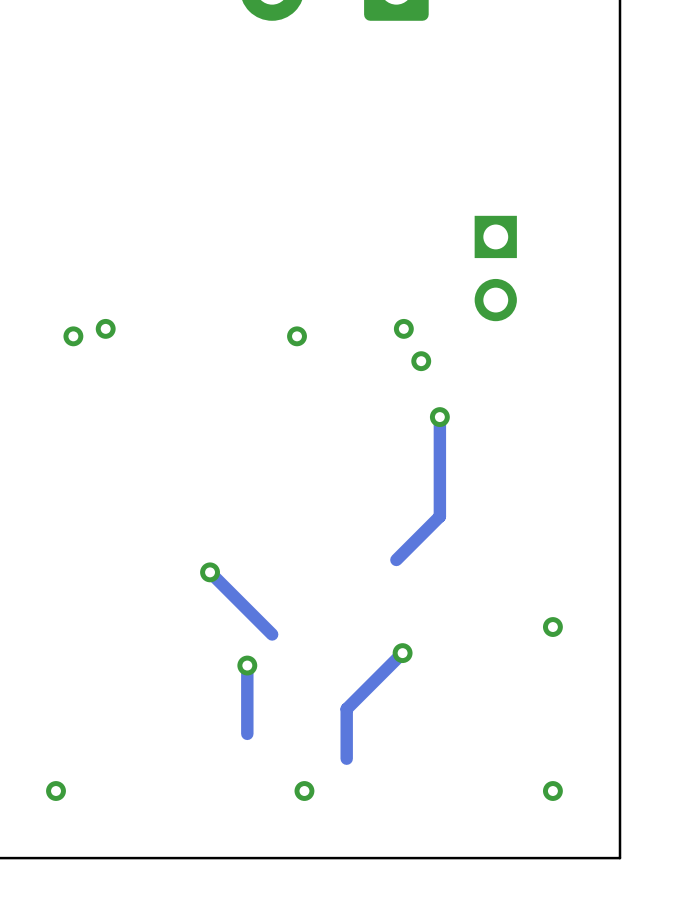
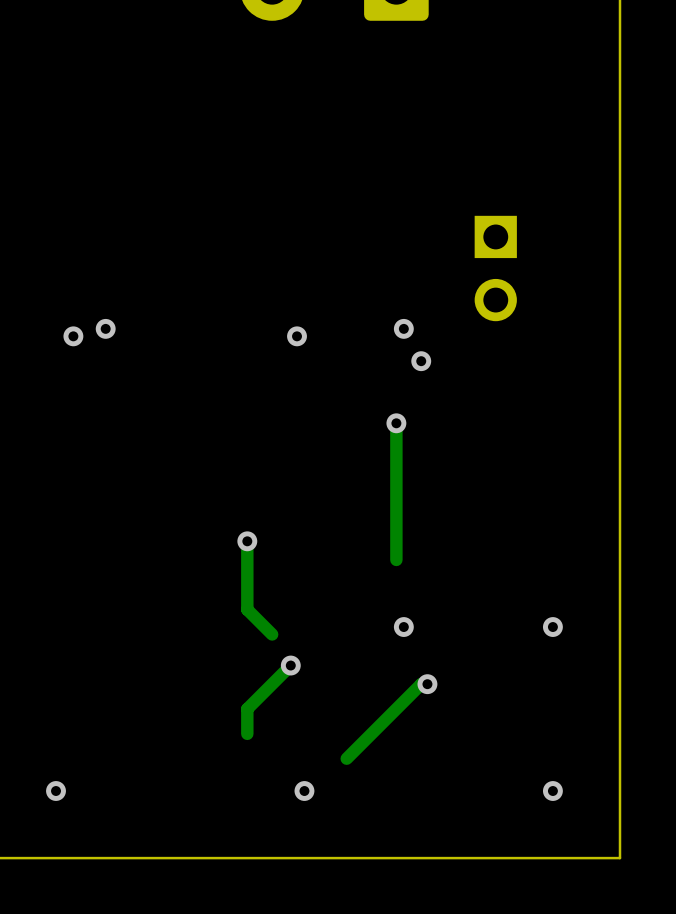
track: (439, 417) (439, 516) (396, 559) -> (396, 423) (396, 559)
via position: (439, 417) -> (396, 423)
track: (210, 572) (247, 609) -> (247, 541) (247, 609)
via position: (210, 572) -> (247, 541)
via: none -> (403, 627)
track: (402, 653) (346, 709) (346, 758) -> (427, 684) (421, 684) (346, 758)
via: (402, 653) -> none
track: (247, 665) (247, 709) -> (290, 665) (247, 709)
via position: (247, 665) -> (290, 665)
via: none -> (427, 684)

